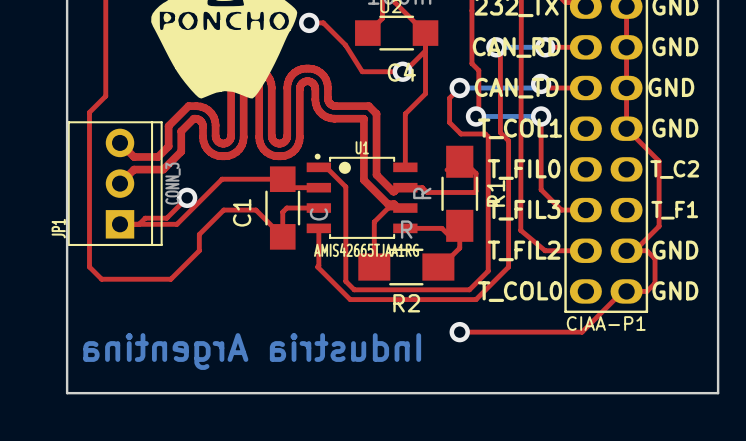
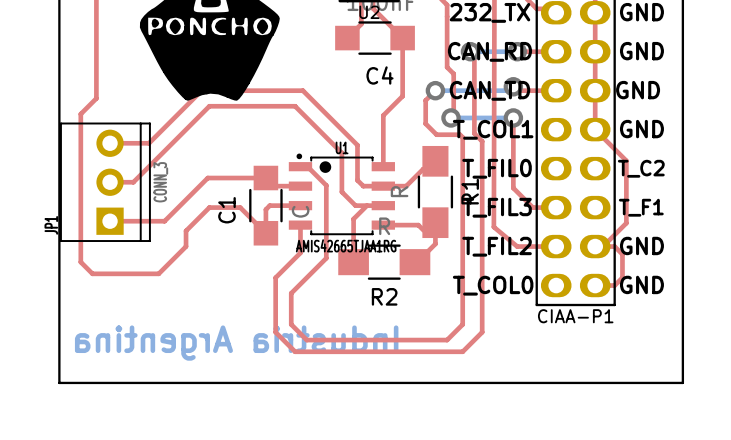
top track: (309, 22) (323, 22) (345, 45) (362, 71) (404, 71) (425, 50) -> none
via: (309, 22) -> none
via: (402, 71) -> none
top track: (120, 142) (134, 156) (158, 156) (168, 146) (168, 126) (188, 106) (200, 106) (208, 110) (215, 121) (216, 139) (221, 143) (226, 142) (231, 135) (231, 83) (238, 72) (250, 68) (260, 70) (269, 79) (271, 87) (271, 137) (276, 142) (282, 142) (287, 135) (287, 87) (289, 79) (298, 70) (313, 69) (320, 72) (326, 79) (328, 100) (330, 104) (368, 106) (376, 113) (376, 174) (393, 191) (397, 187) -> (110, 143) (149, 143) (201, 90) (302, 90) (357, 145) (357, 180) (363, 186) (376, 186)
top track: (459, 161) (464, 161) (476, 173) (474, 192) (427, 192) (422, 187) -> (423, 169) (406, 186) (399, 186)
top track: (120, 183) (134, 169) (163, 169) (181, 151) (181, 131) (193, 118) (198, 119) (202, 123) (203, 141) (210, 152) (222, 156) (236, 152) (243, 141) (243, 88) (245, 84) (249, 81) (254, 81) (258, 87) (259, 137) (261, 145) (266, 152) (274, 155) (288, 154) (295, 149) (299, 141) (300, 87) (302, 82) (307, 81) (314, 85) (315, 103) (322, 114) (334, 118) (363, 119) (363, 180) (387, 204) (394, 204) (397, 208) (405, 208) -> (110, 182) (133, 182) (209, 106) (295, 106) (341, 153) (341, 191) (355, 205) (366, 205)
top track: (187, 197) (166, 218) (145, 218) (139, 224) -> none
via: (187, 197) -> none
top track: (318, 257) (317, 267) (350, 299) (476, 299) (508, 267) -> (300, 252) (275, 277) (275, 332) (295, 351) (462, 351) (482, 332) (482, 262)
top track: (345, 262) (345, 281) (354, 289) (469, 289) (488, 271) -> (326, 258) (291, 293) (291, 324) (306, 340) (447, 340) (462, 324) (462, 266)
top track: (626, 291) (622, 291) (582, 332) (459, 332) -> none
via: (459, 332) -> none

